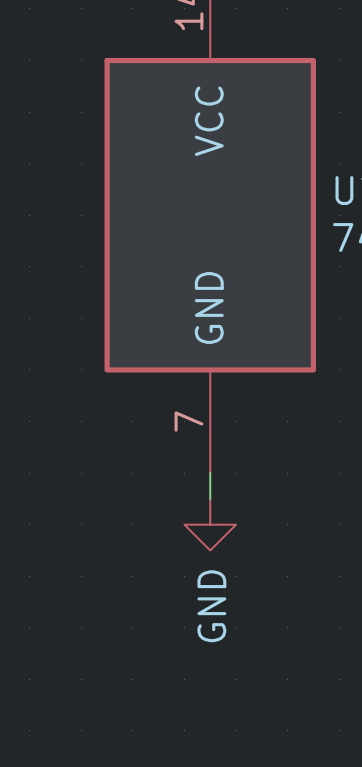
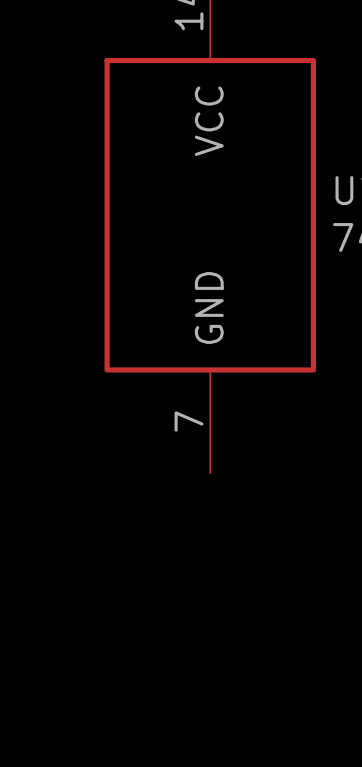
wire: (210, 473) (210, 498) -> none
power symbol: GND (210, 524) -> none

